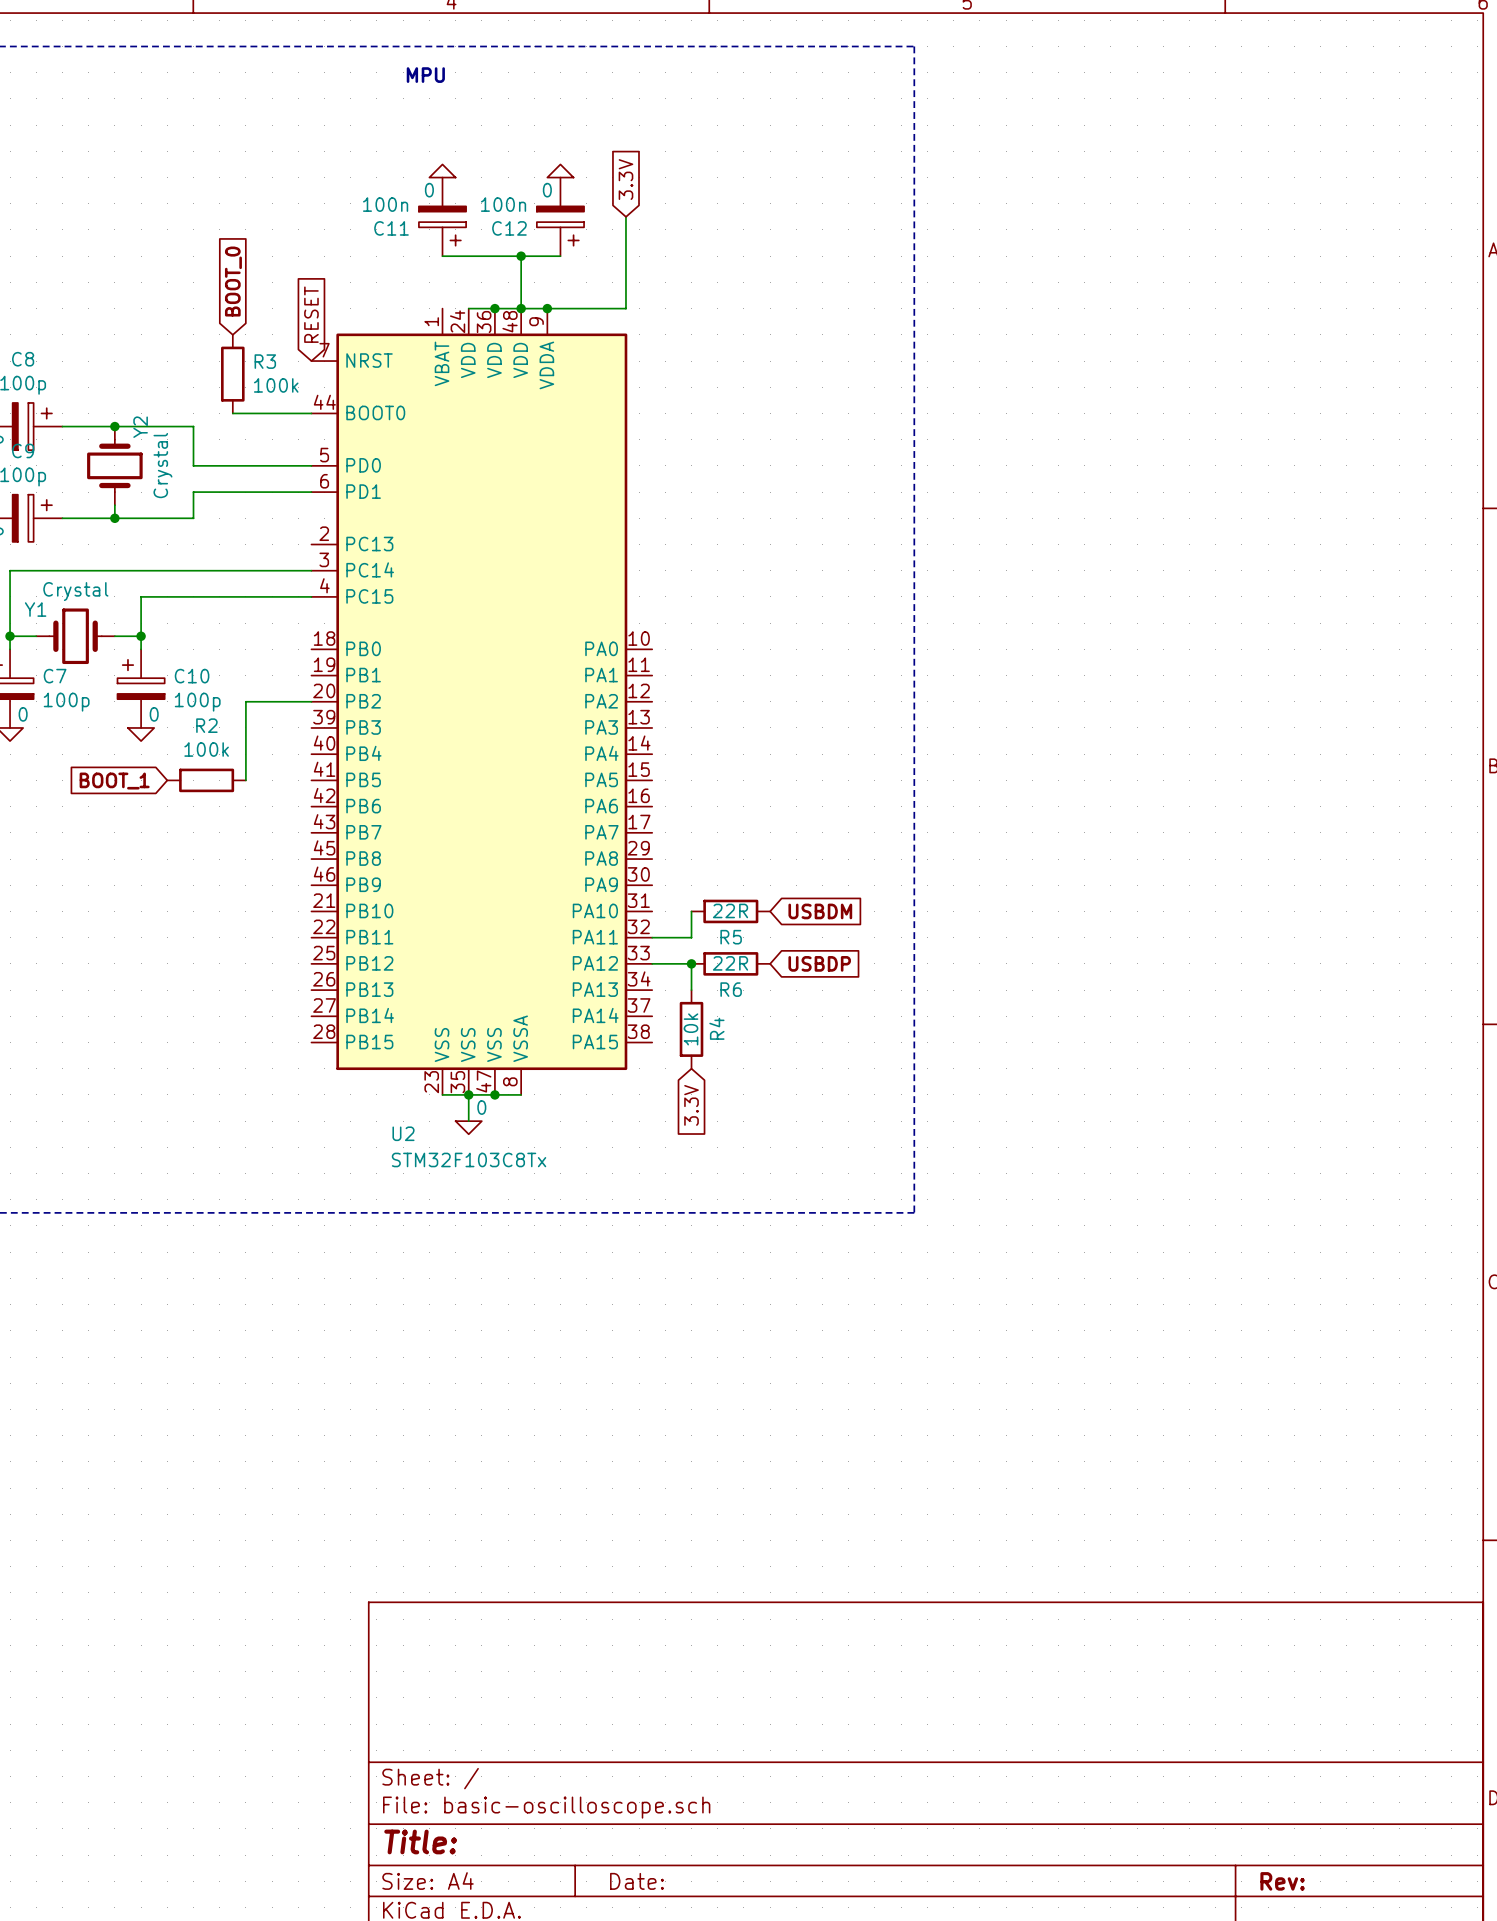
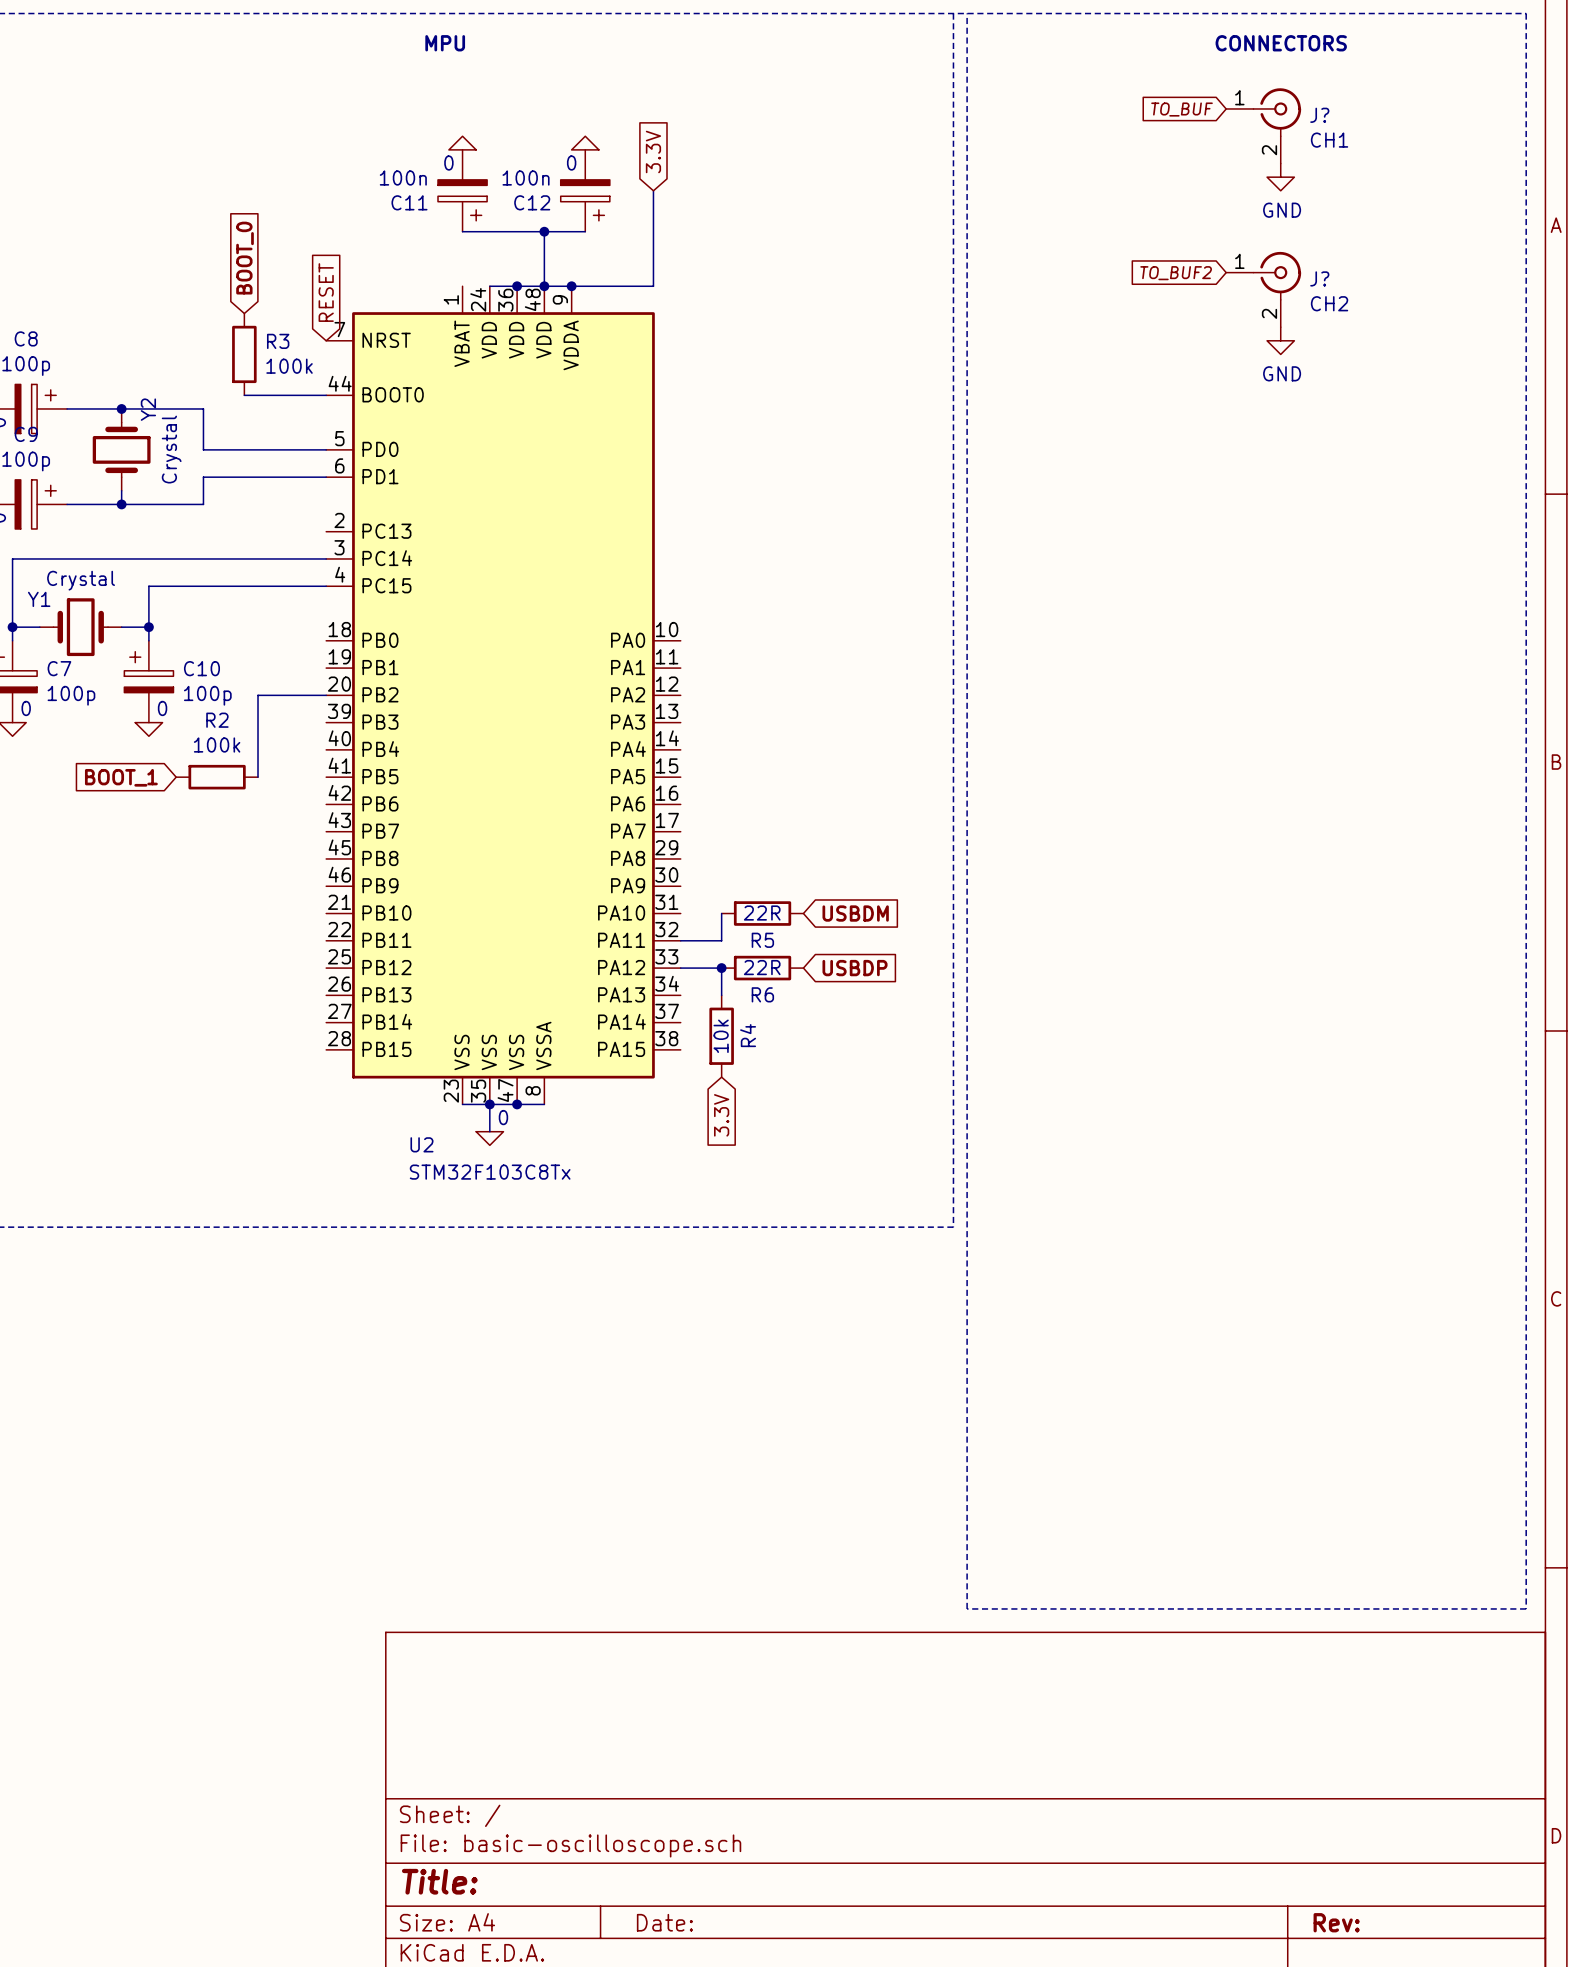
line: none -> (953, 13) (1526, 13) (1526, 1608) (967, 1608) (967, 13)
text: none -> CONNECTORS (1281, 43)
global label: none -> TO_BUF (1182, 109)
J?: none -> CH1 (1263, 125)
power symbol: none -> GND (1280, 177)
global label: none -> TO_BUF2 (1176, 273)
J?: none -> CH2 (1263, 289)
power symbol: none -> GND (1280, 340)

